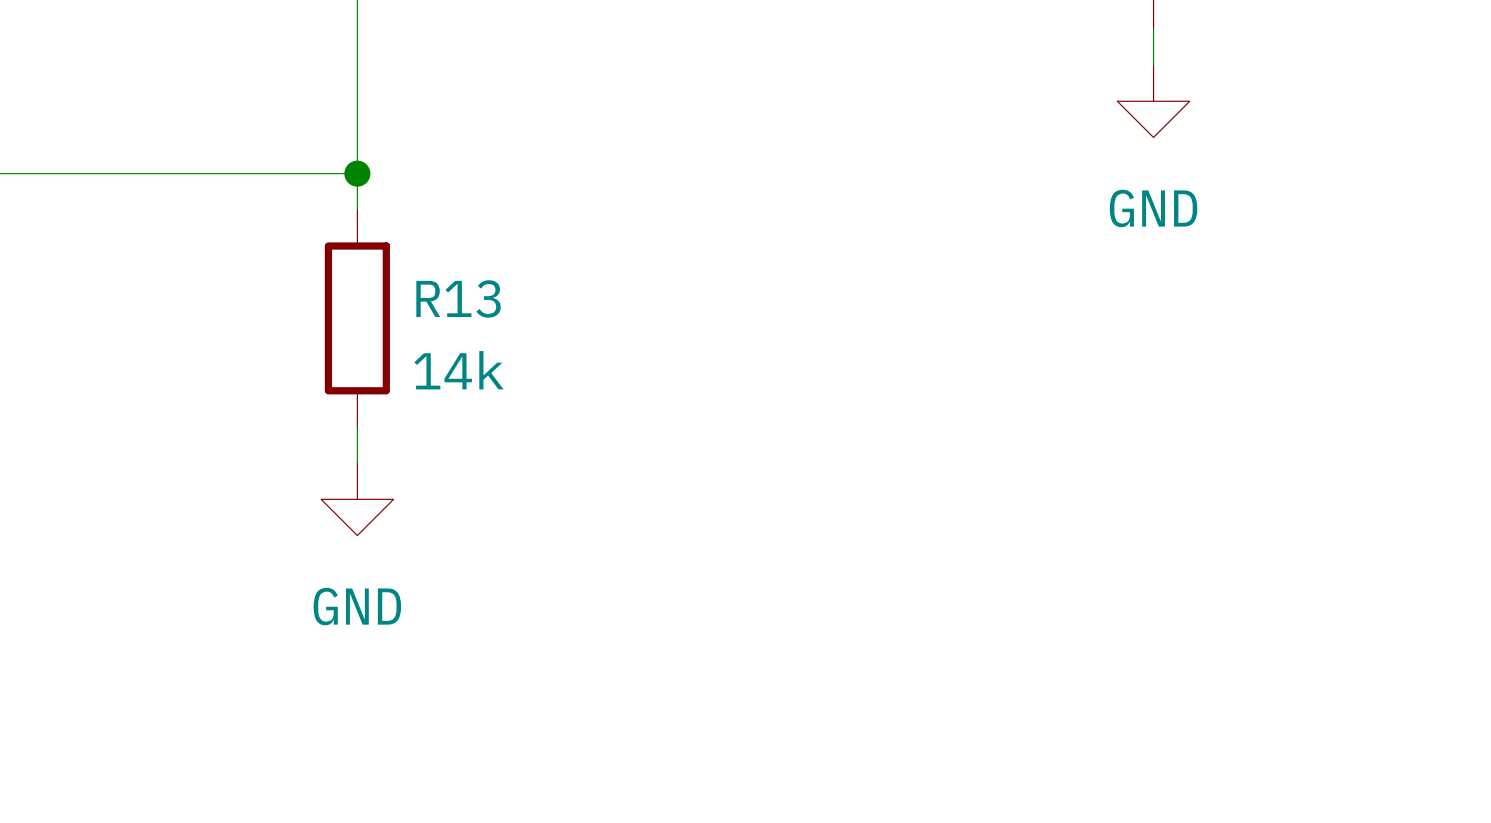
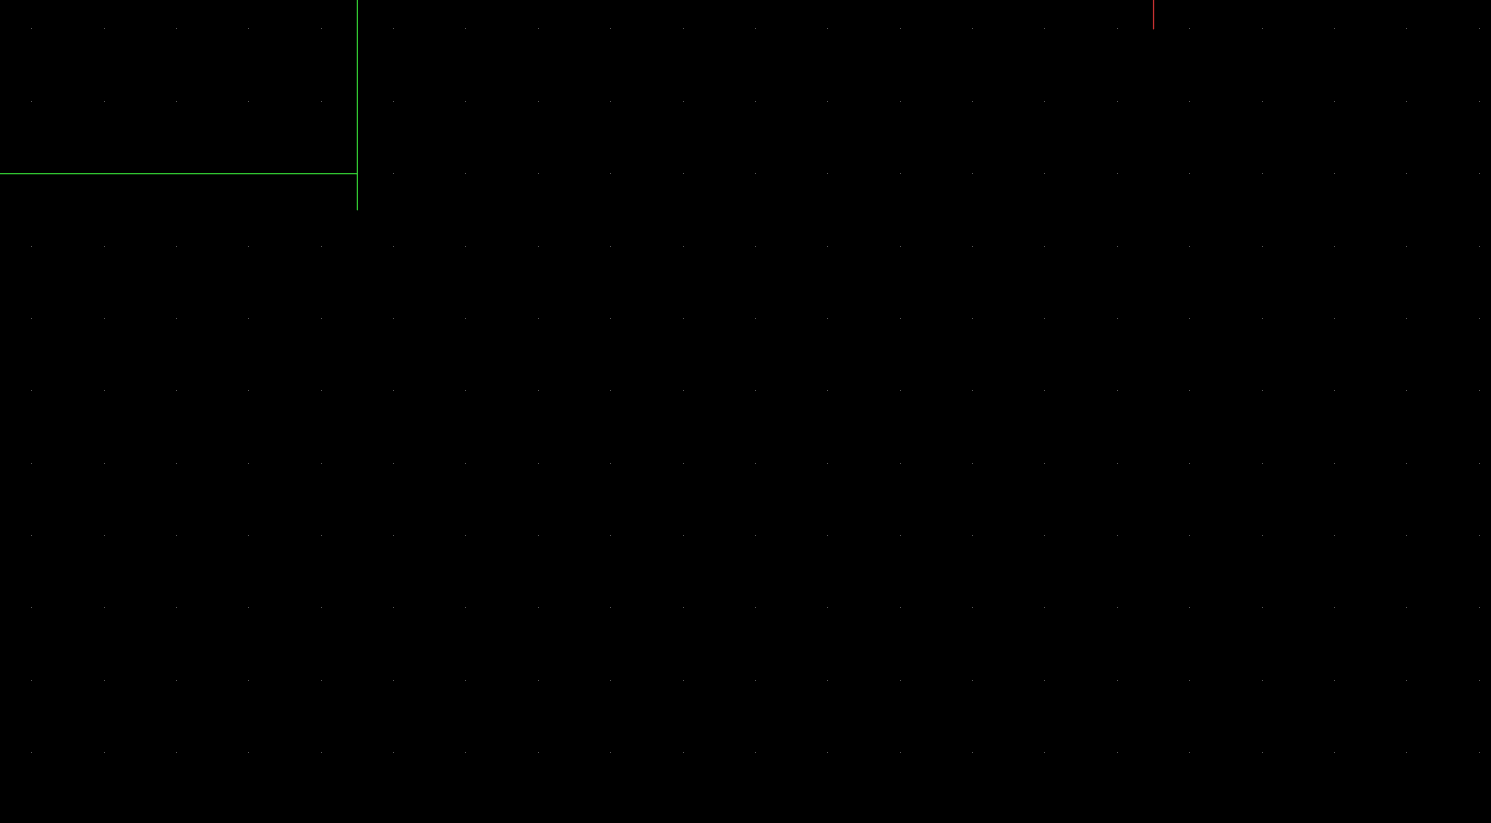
wire: (1153, 28) (1153, 65) -> none
power symbol: GND (1153, 101) -> none
junction: (357, 173) -> none
R13: 14k (357, 318) -> none
wire: (357, 426) (357, 463) -> none
power symbol: GND (357, 499) -> none

